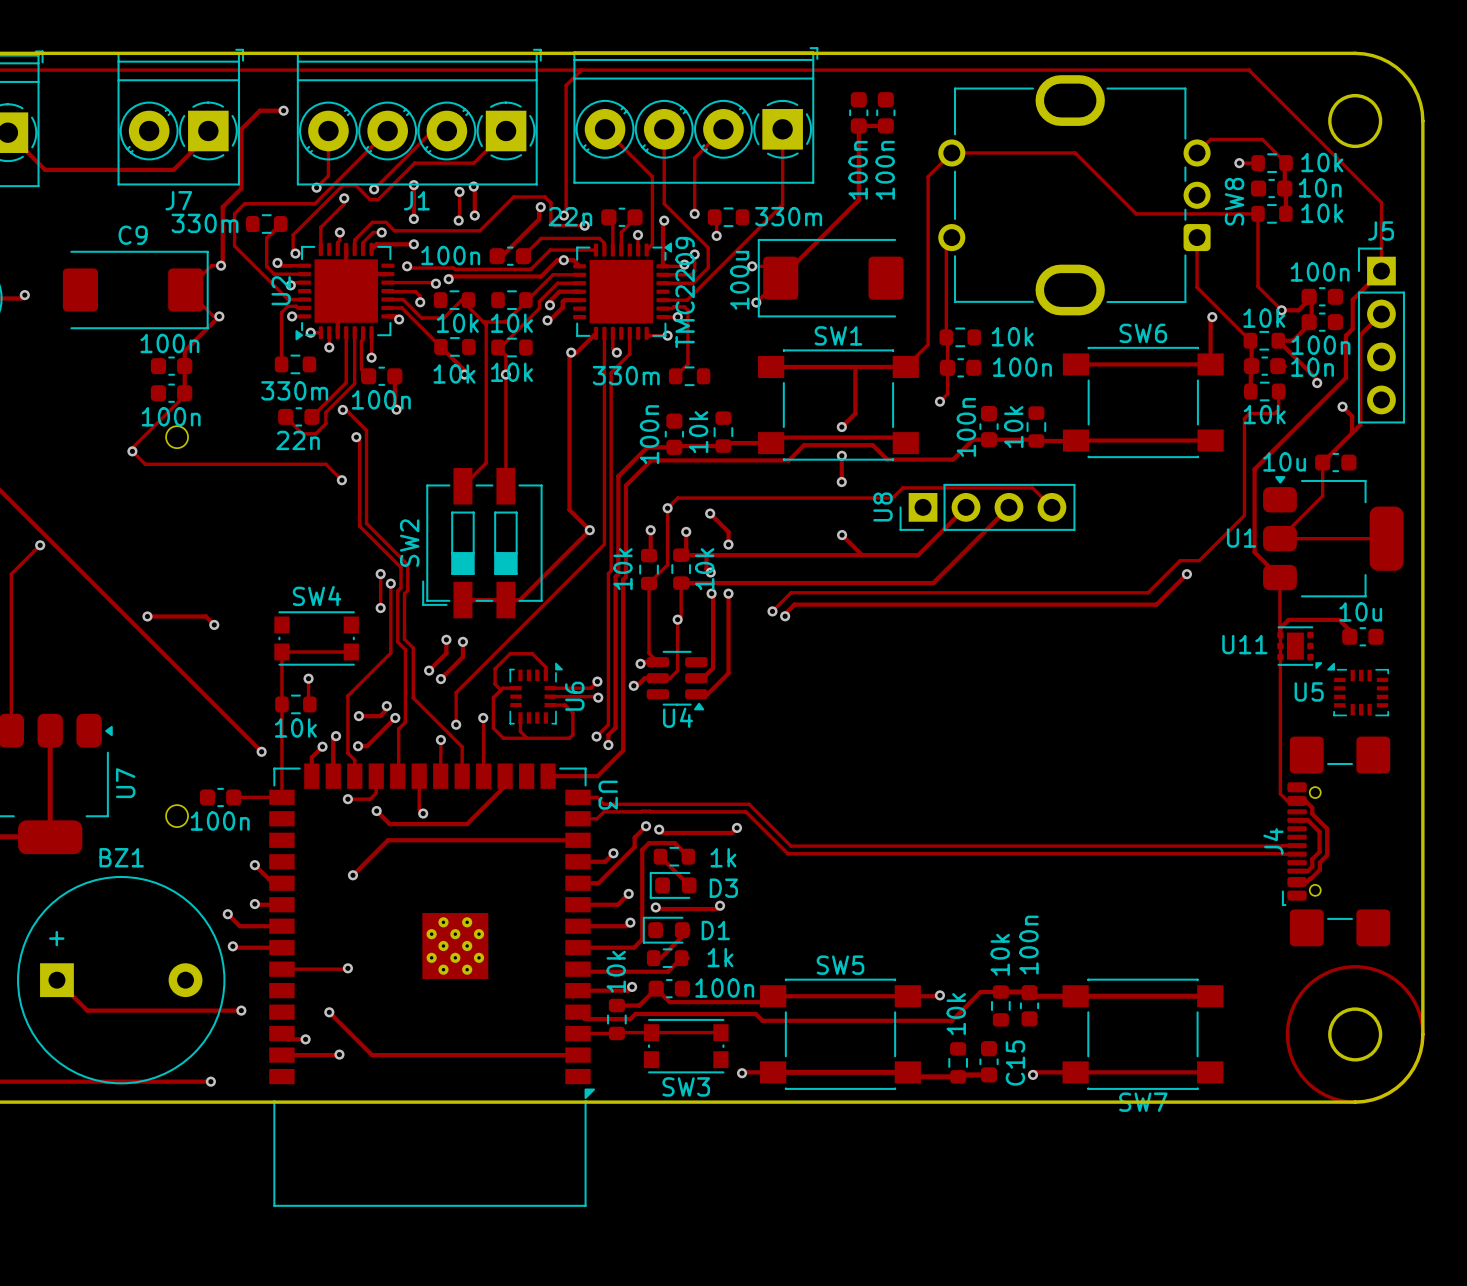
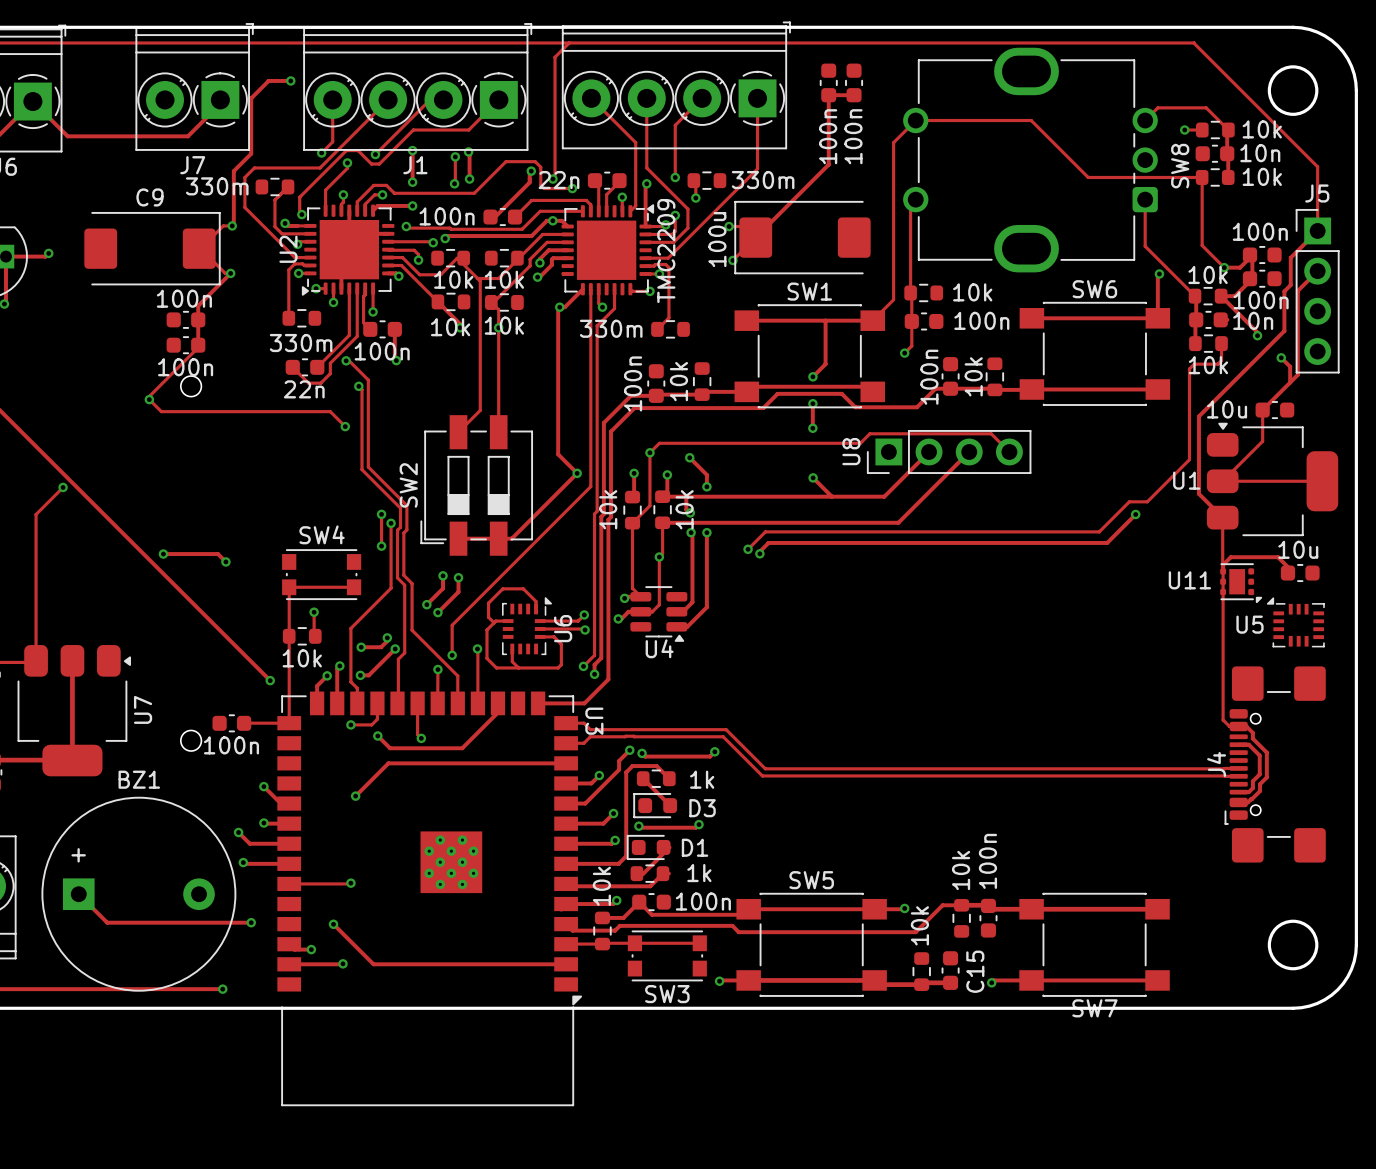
drawing: [1285, 965, 1425, 1104] -> none

